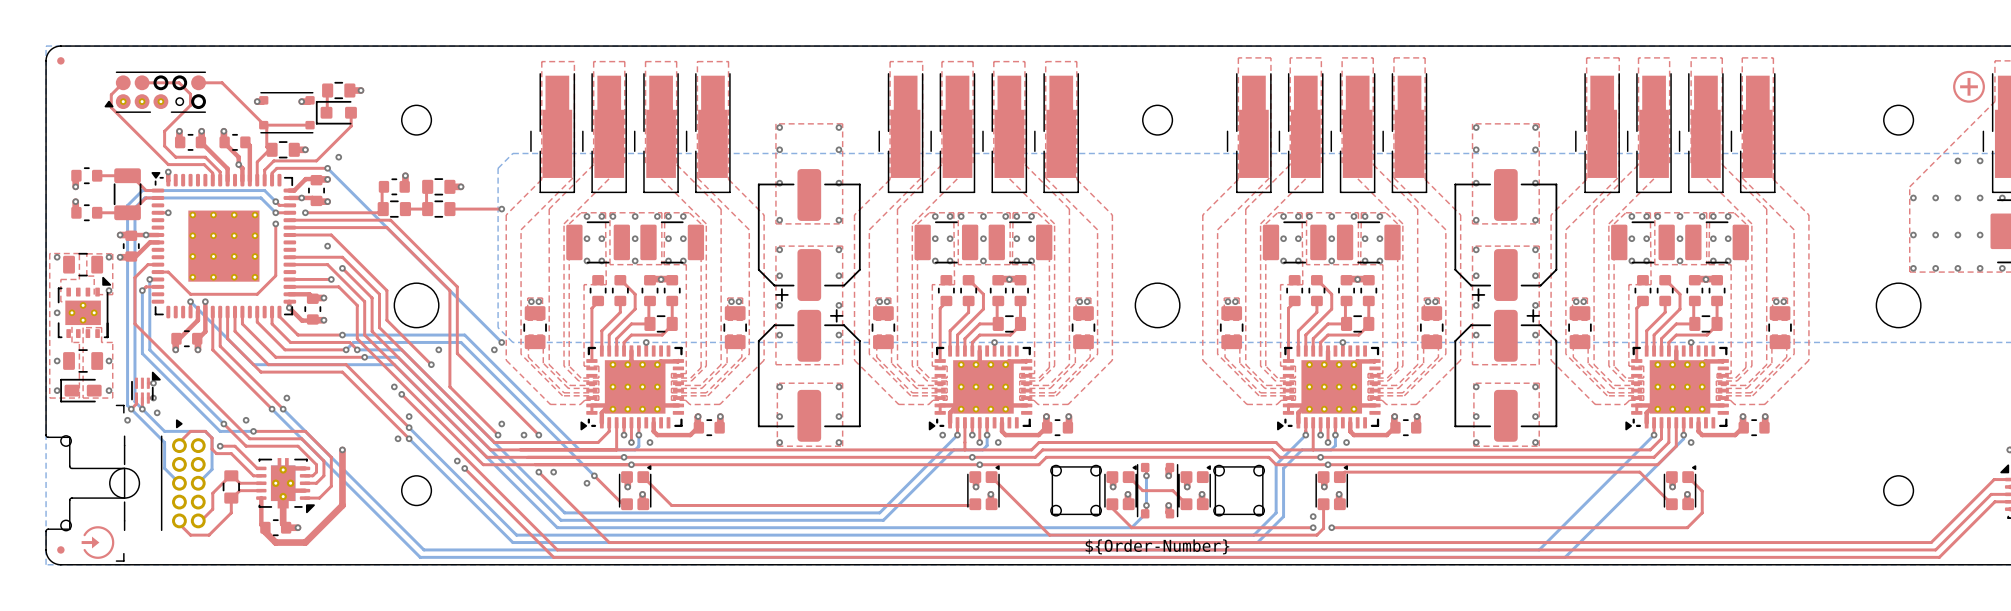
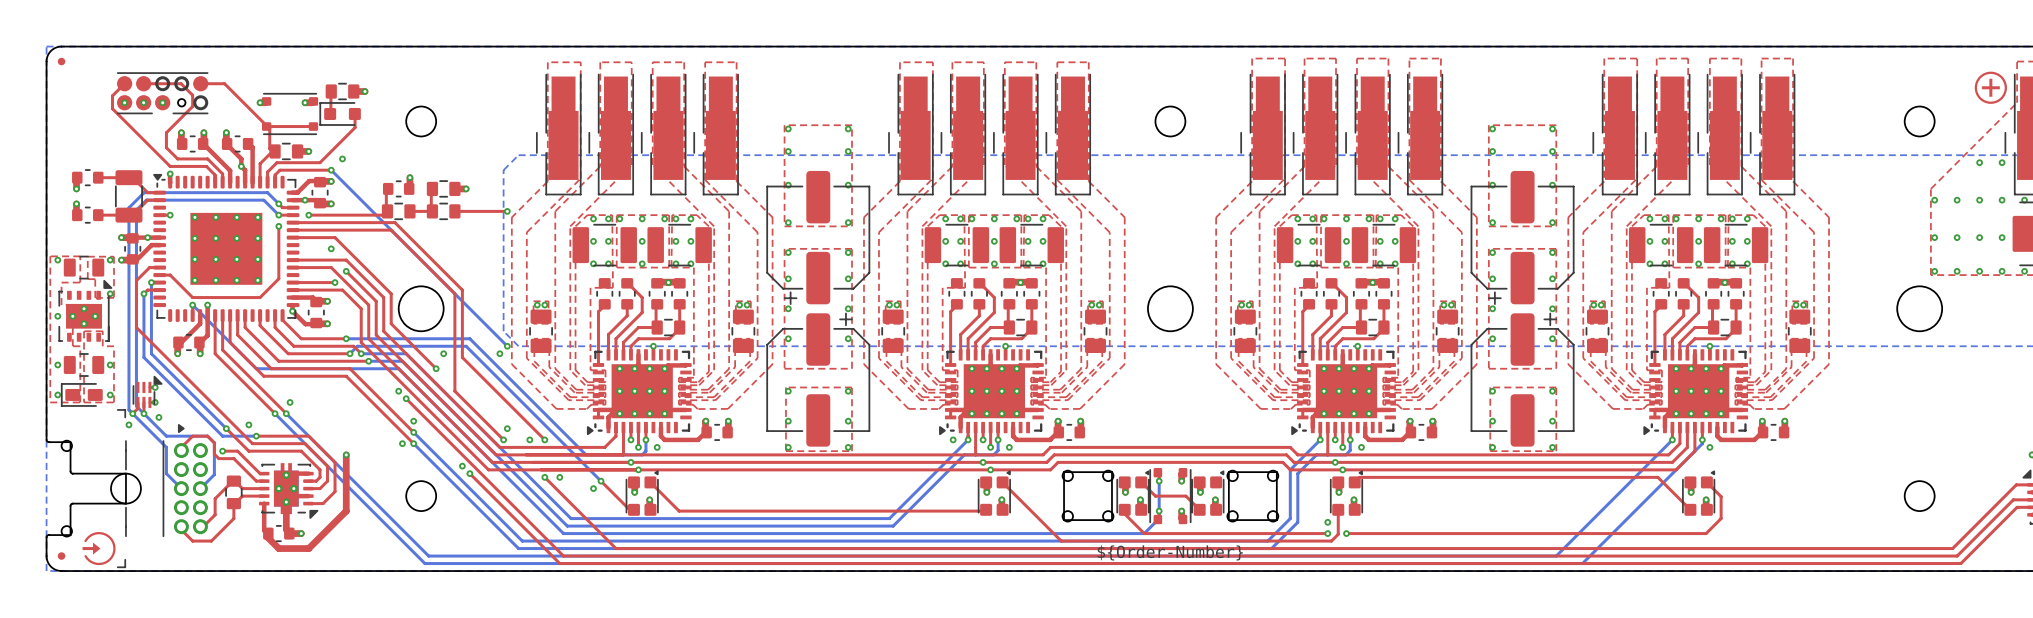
part footprint: [104, 71, 207, 113] -> [117, 72, 209, 115]

